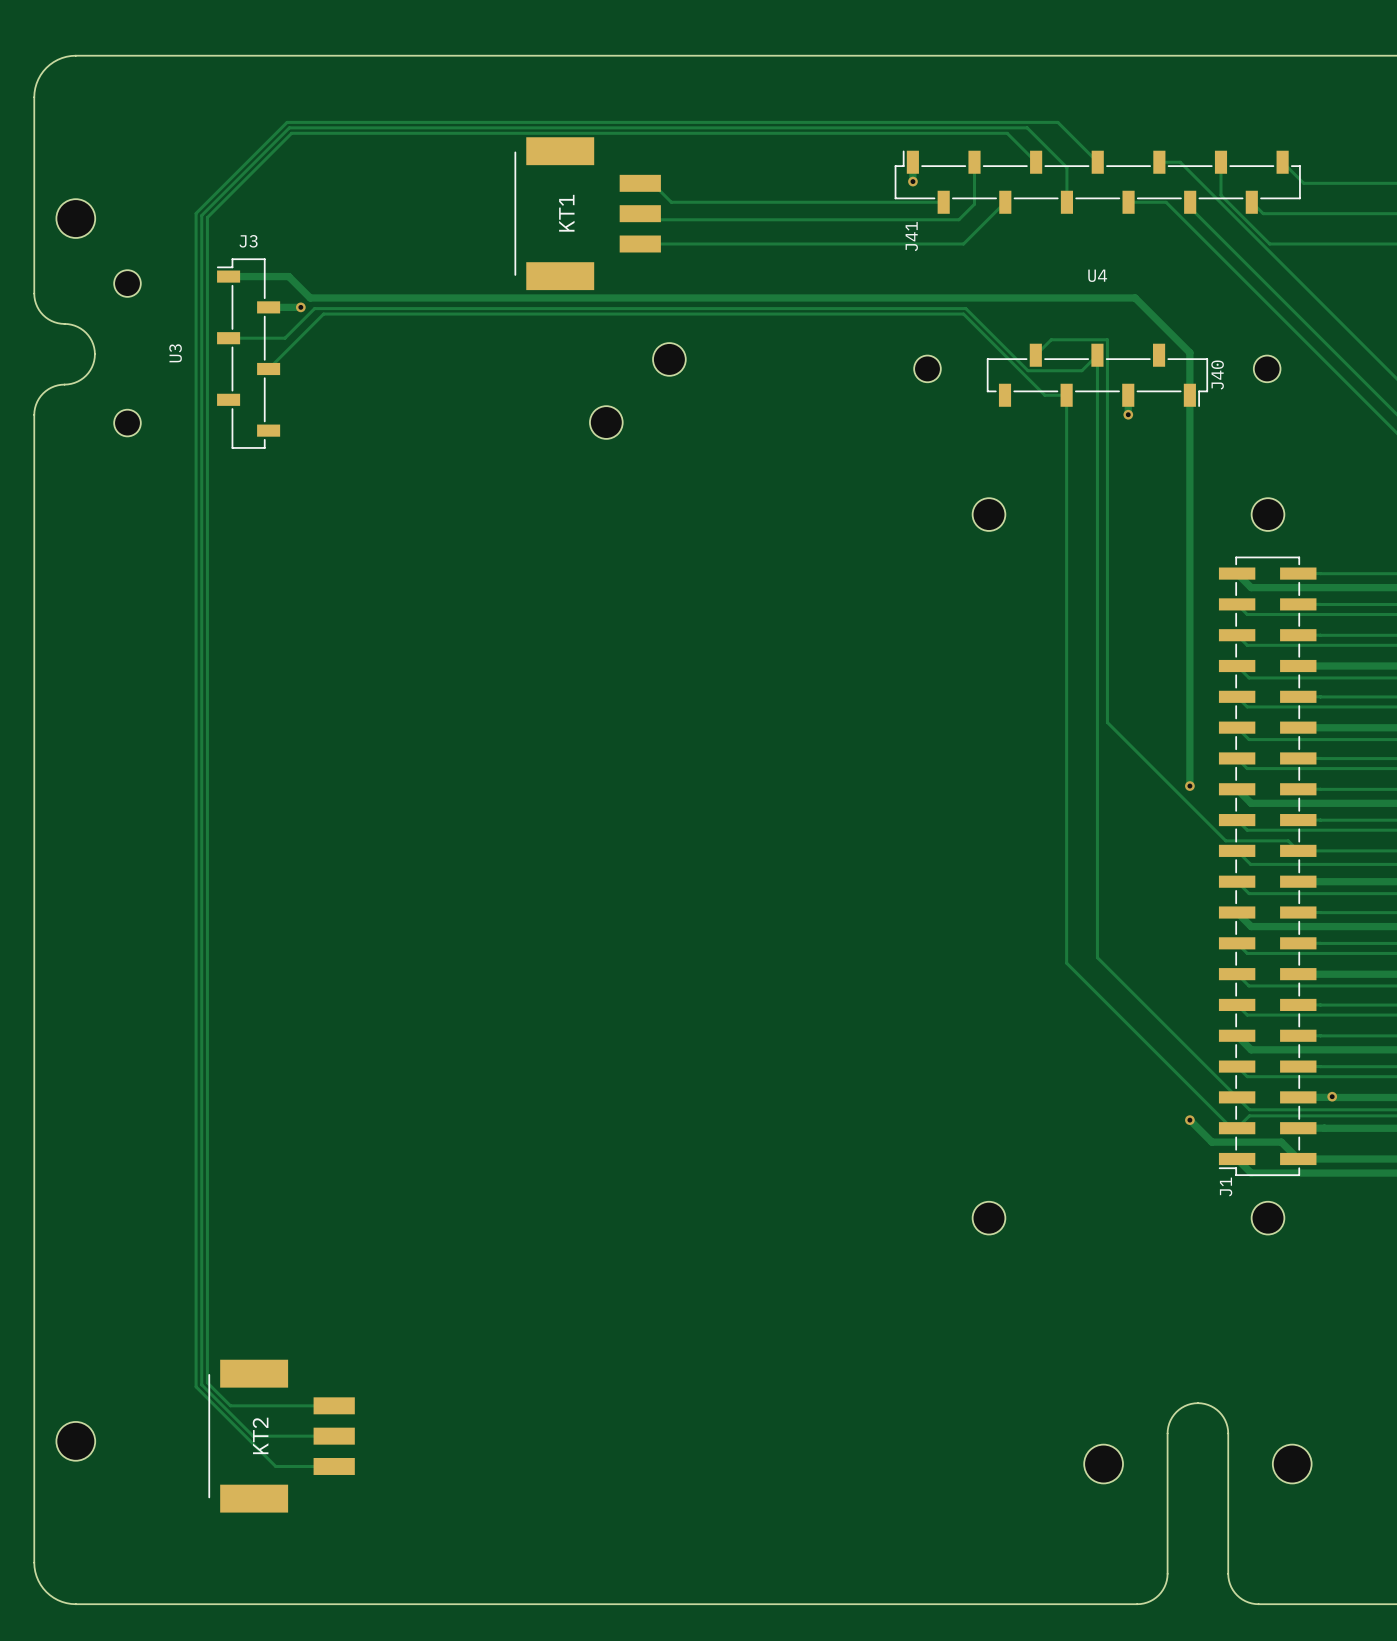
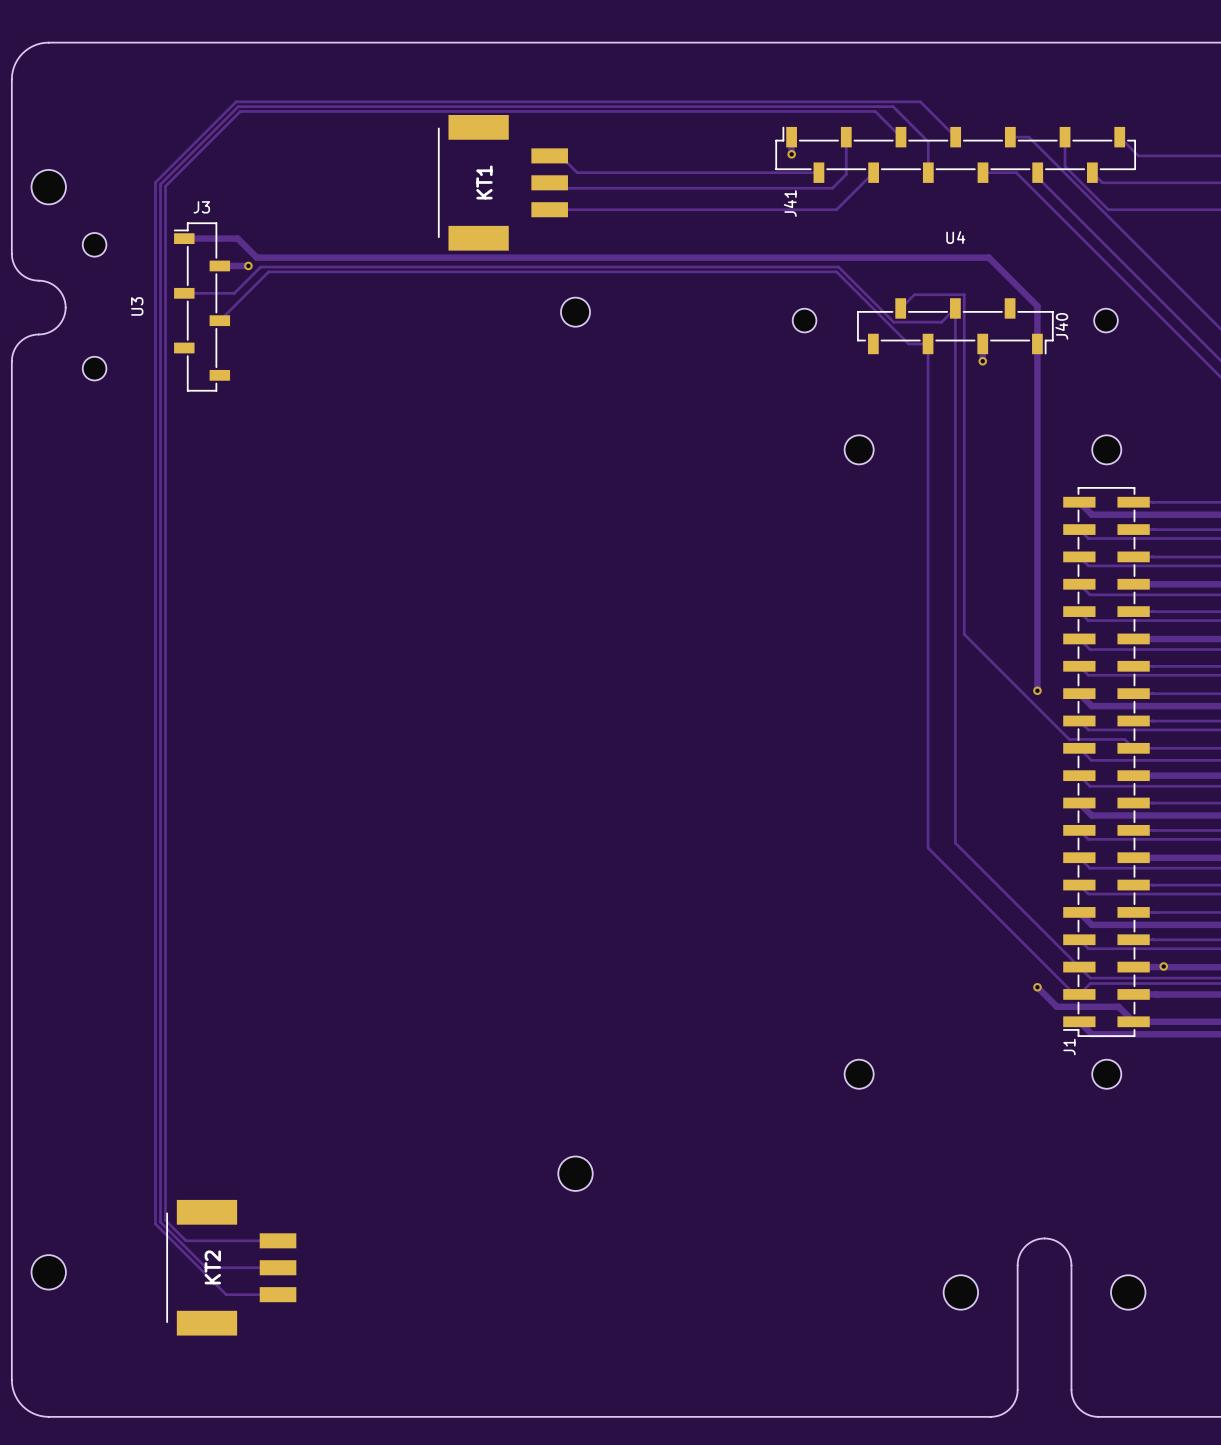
part: (606, 422) -> none
part: none -> (575, 1173)

